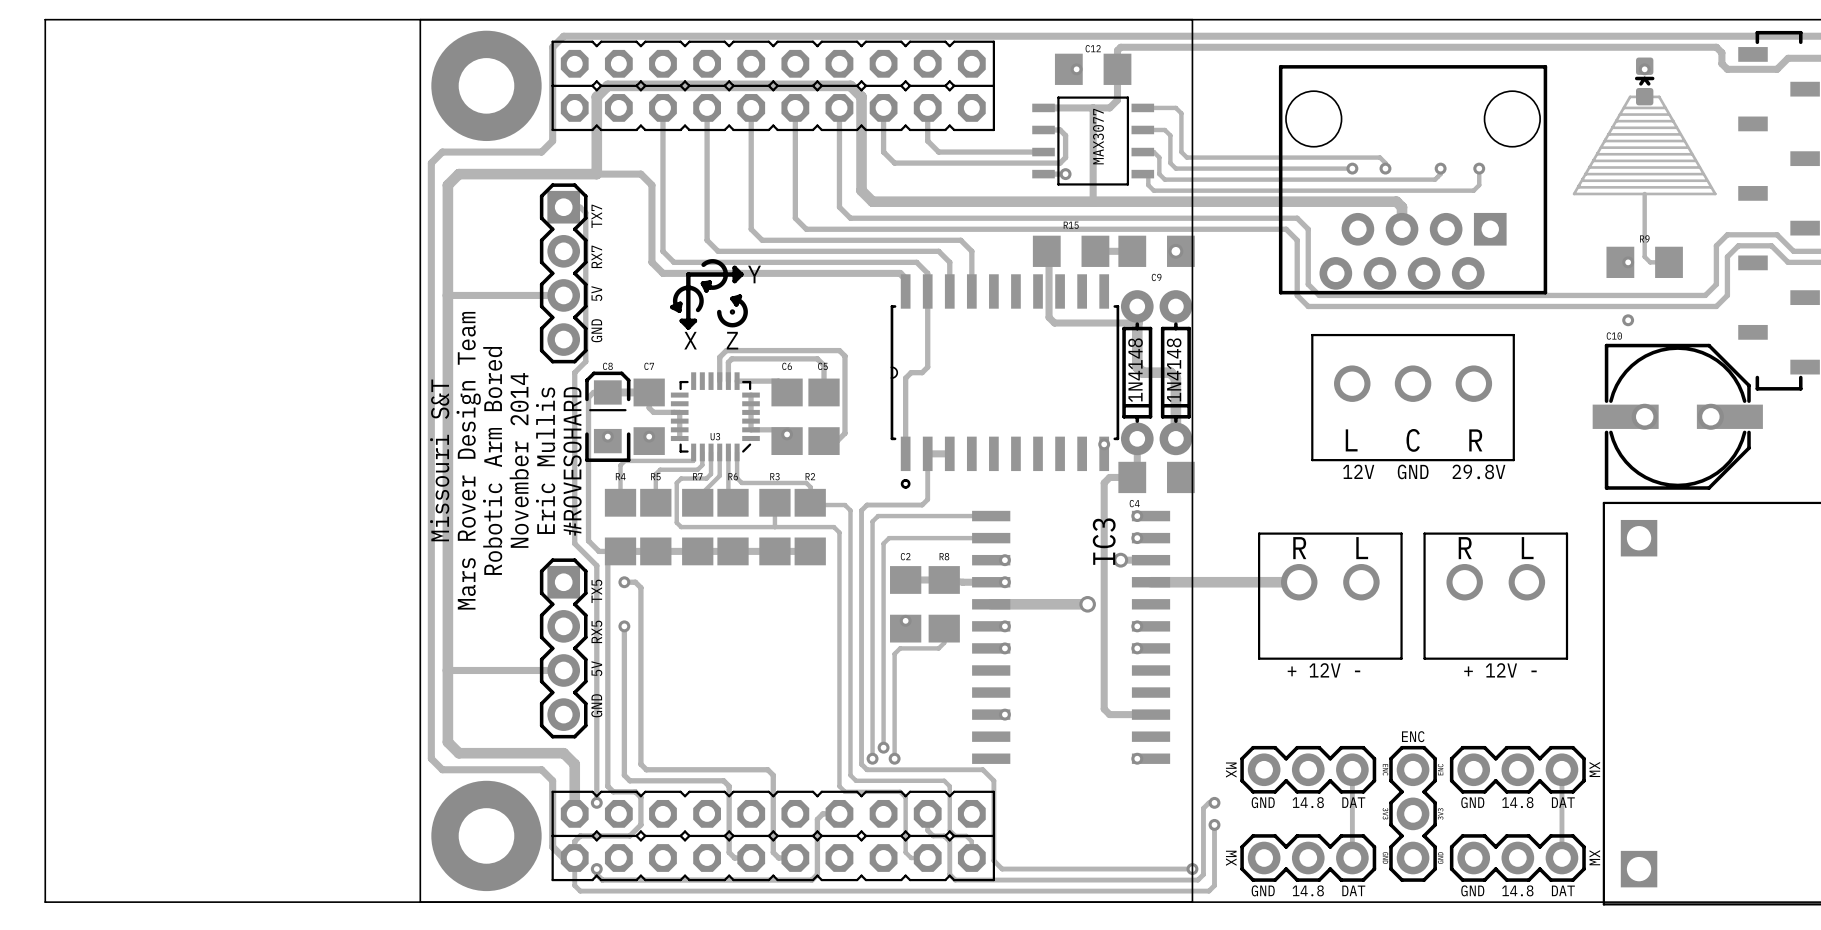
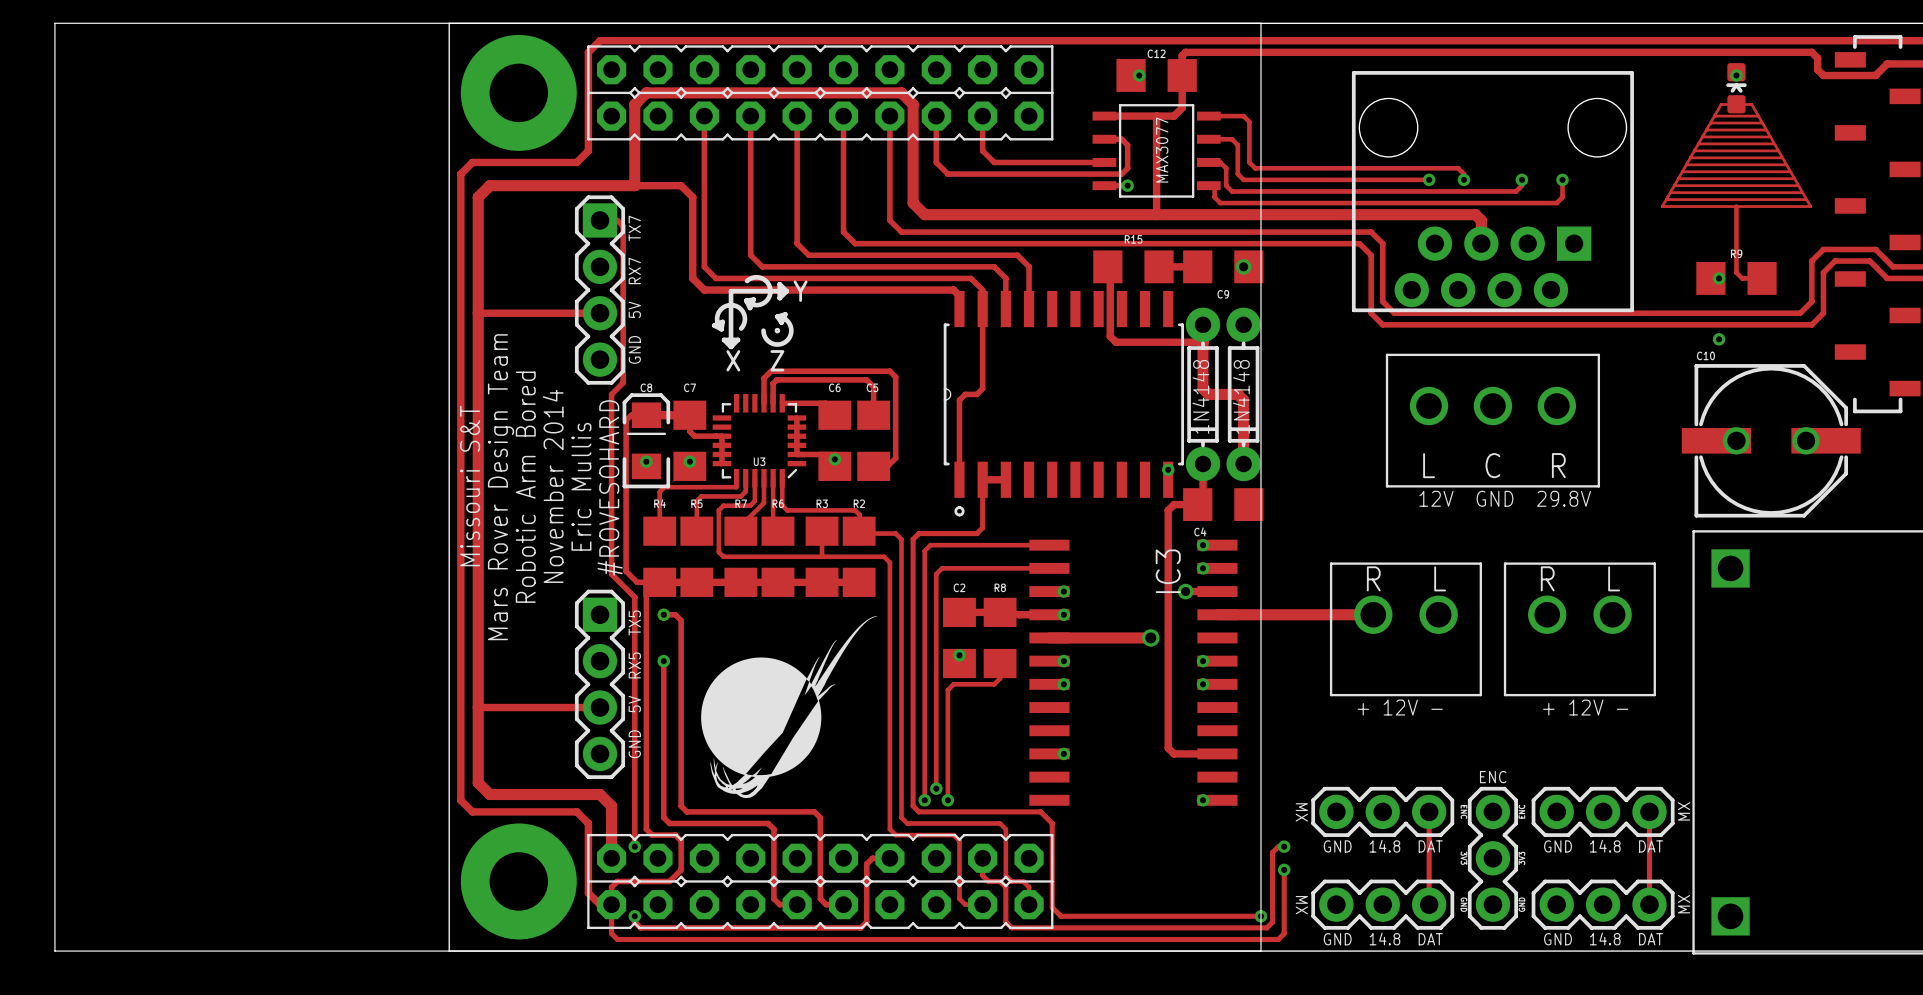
drawing: none -> [701, 616, 878, 799]

